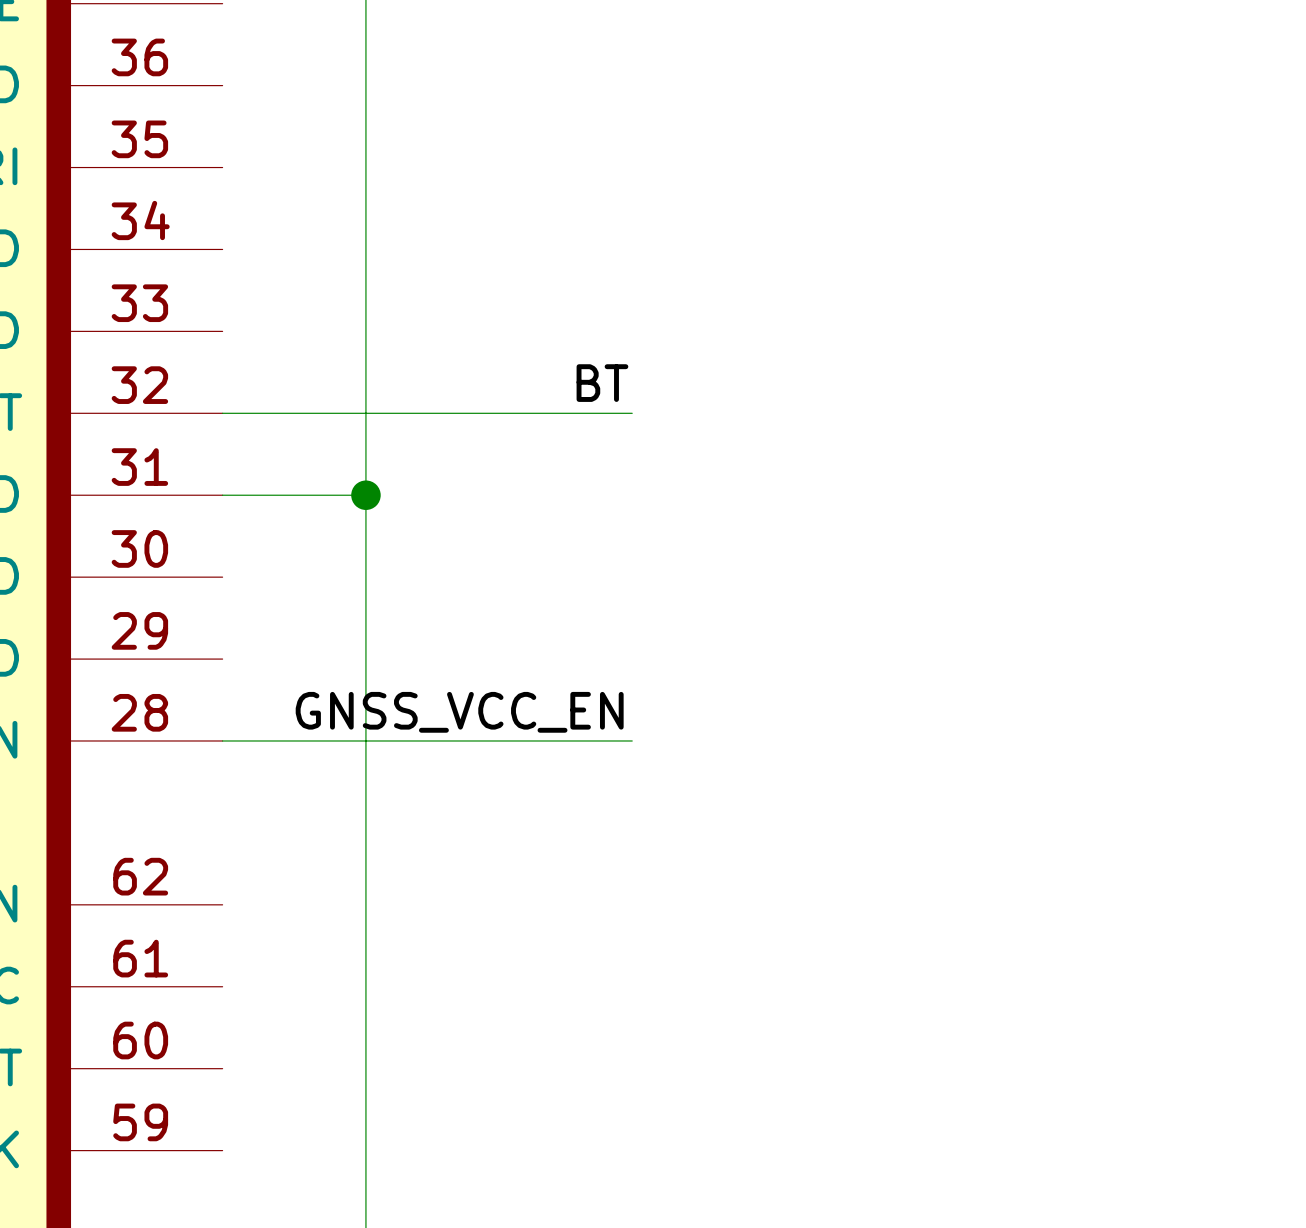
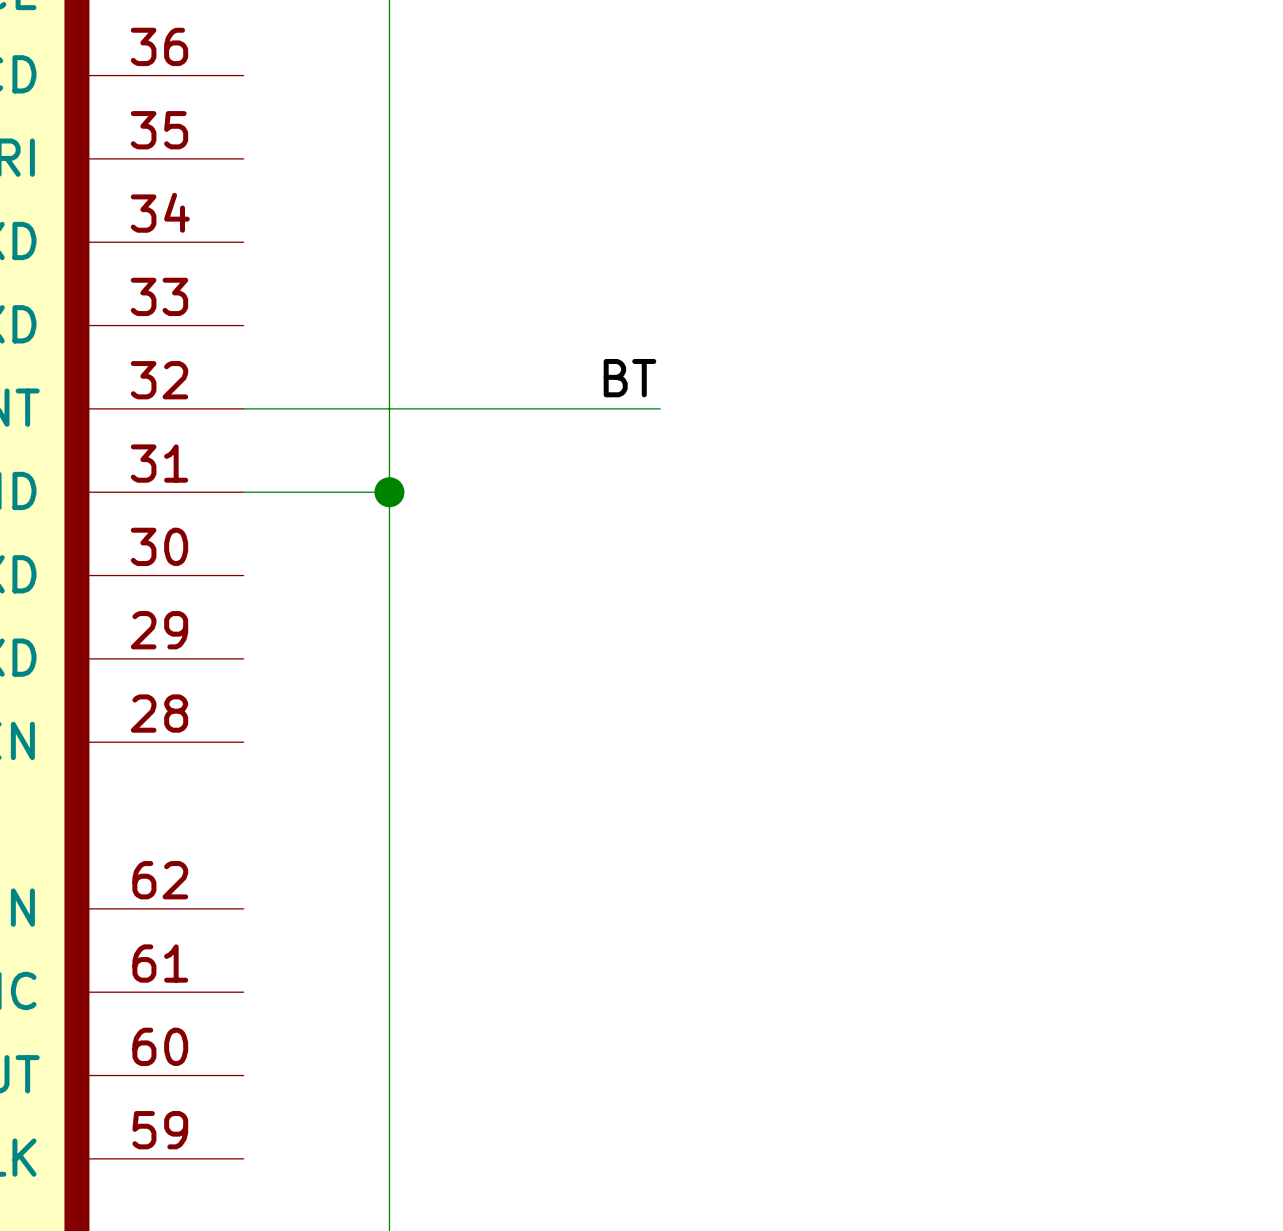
label: GNSS_VCC_EN (459, 712) -> none
wire: (222, 740) (632, 740) -> none

